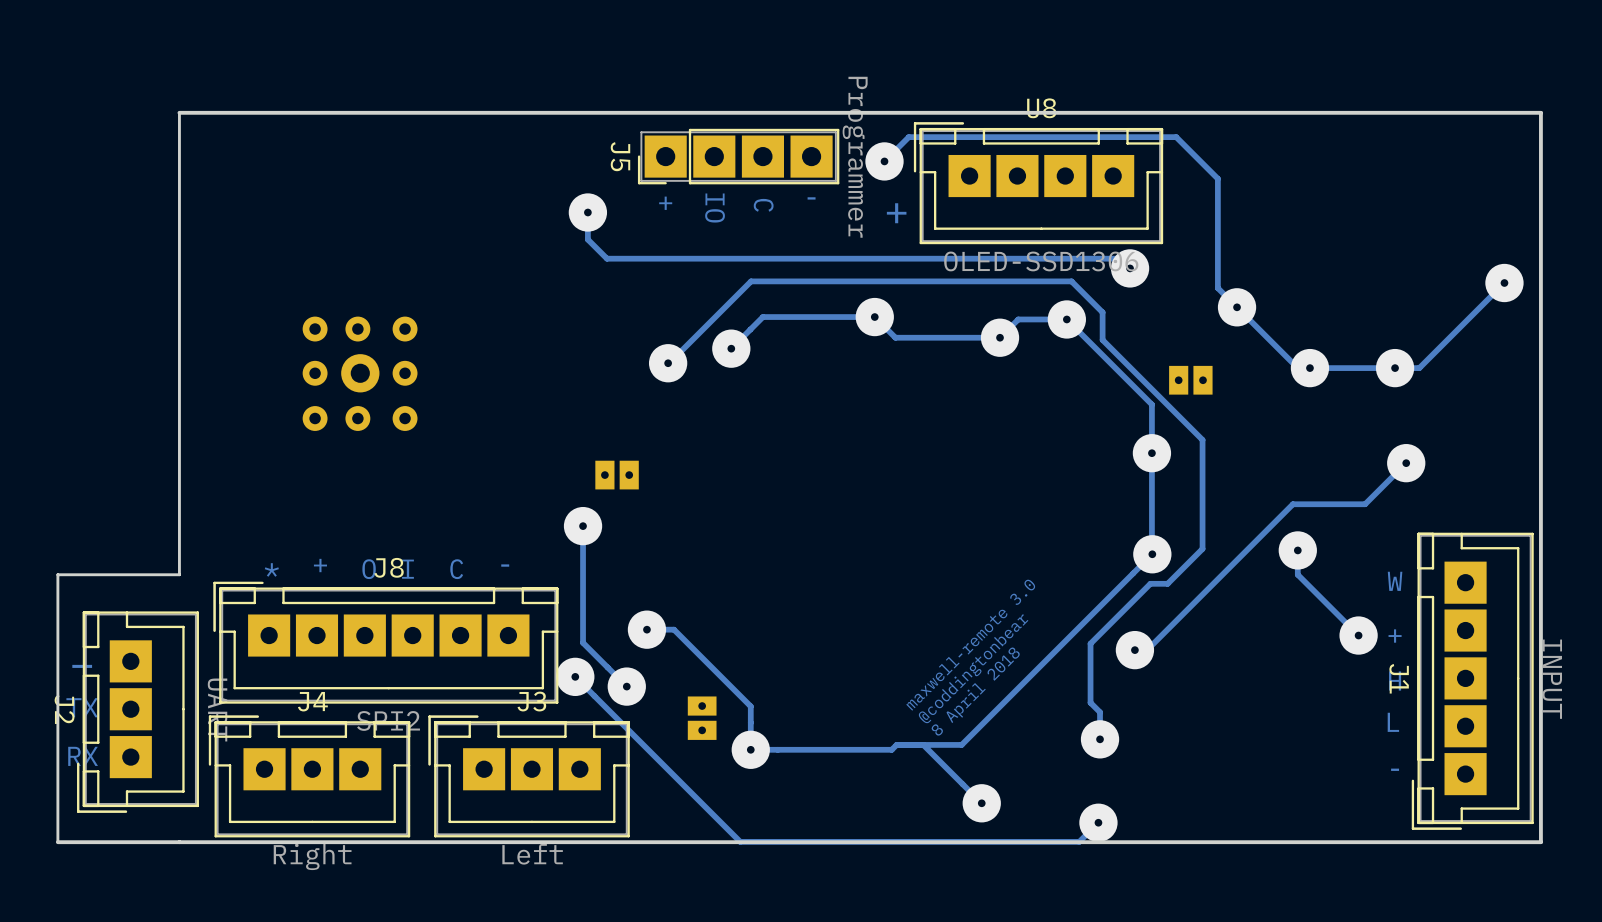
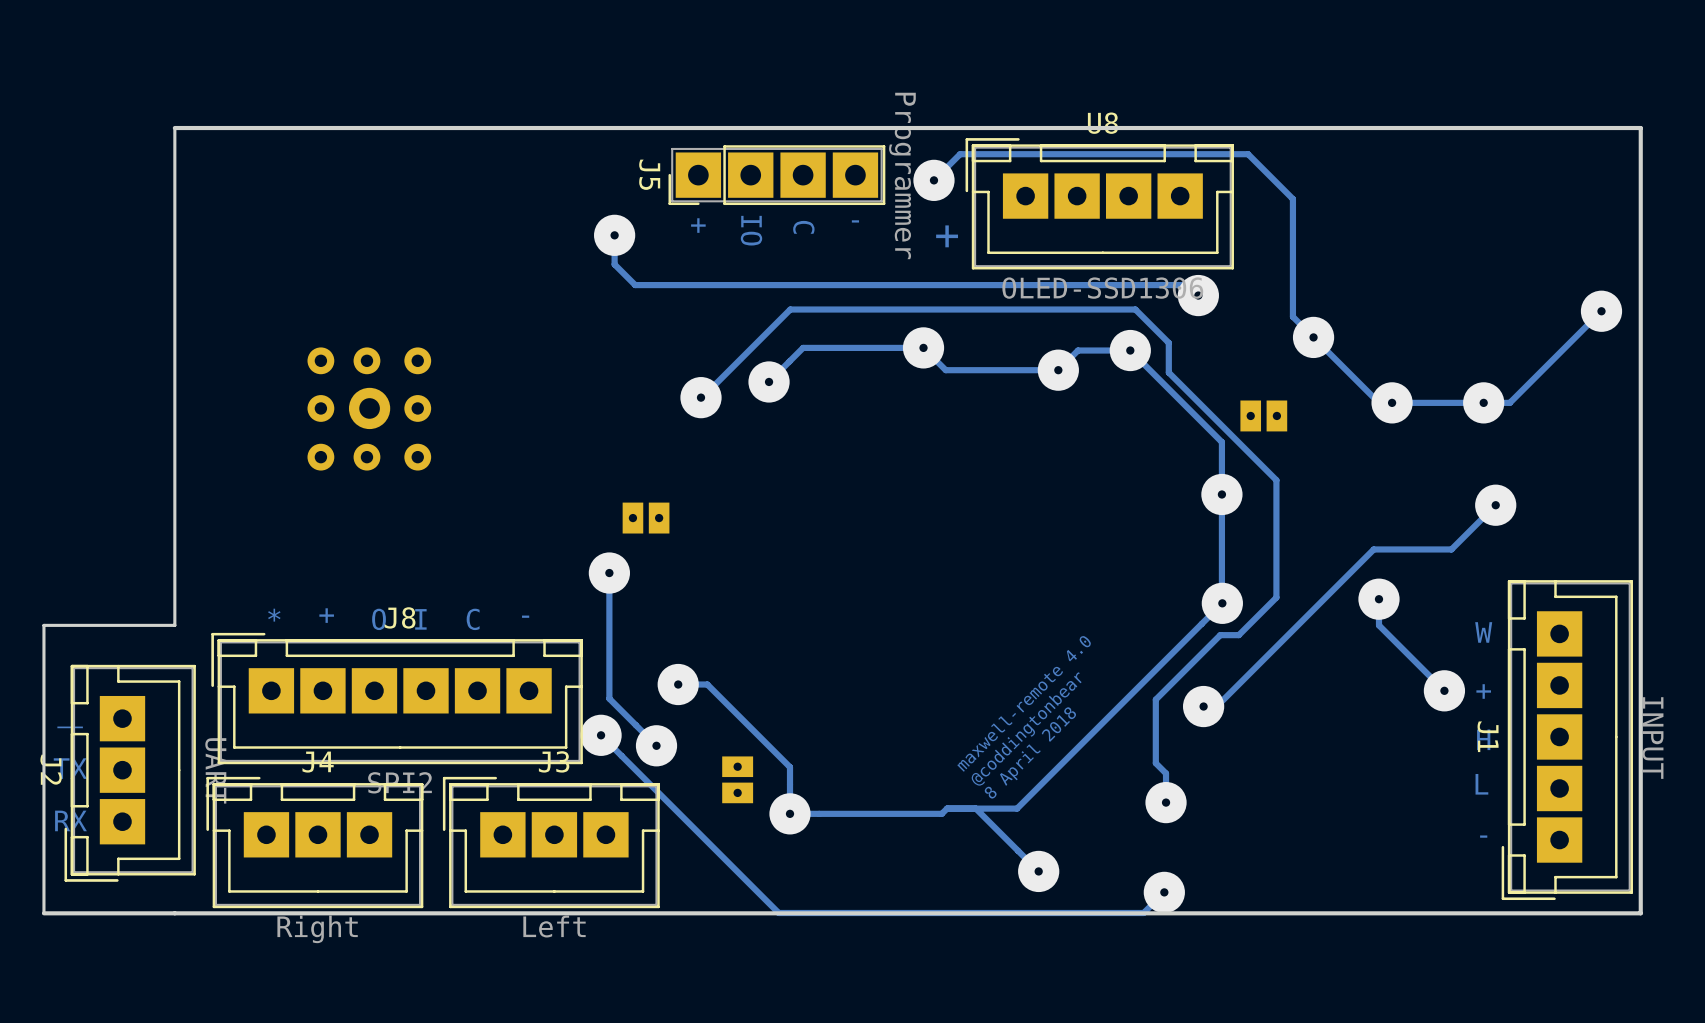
text: maxwell-remote 3.0 (970, 645) -> maxwell-remote 4.0 (1024, 703)

